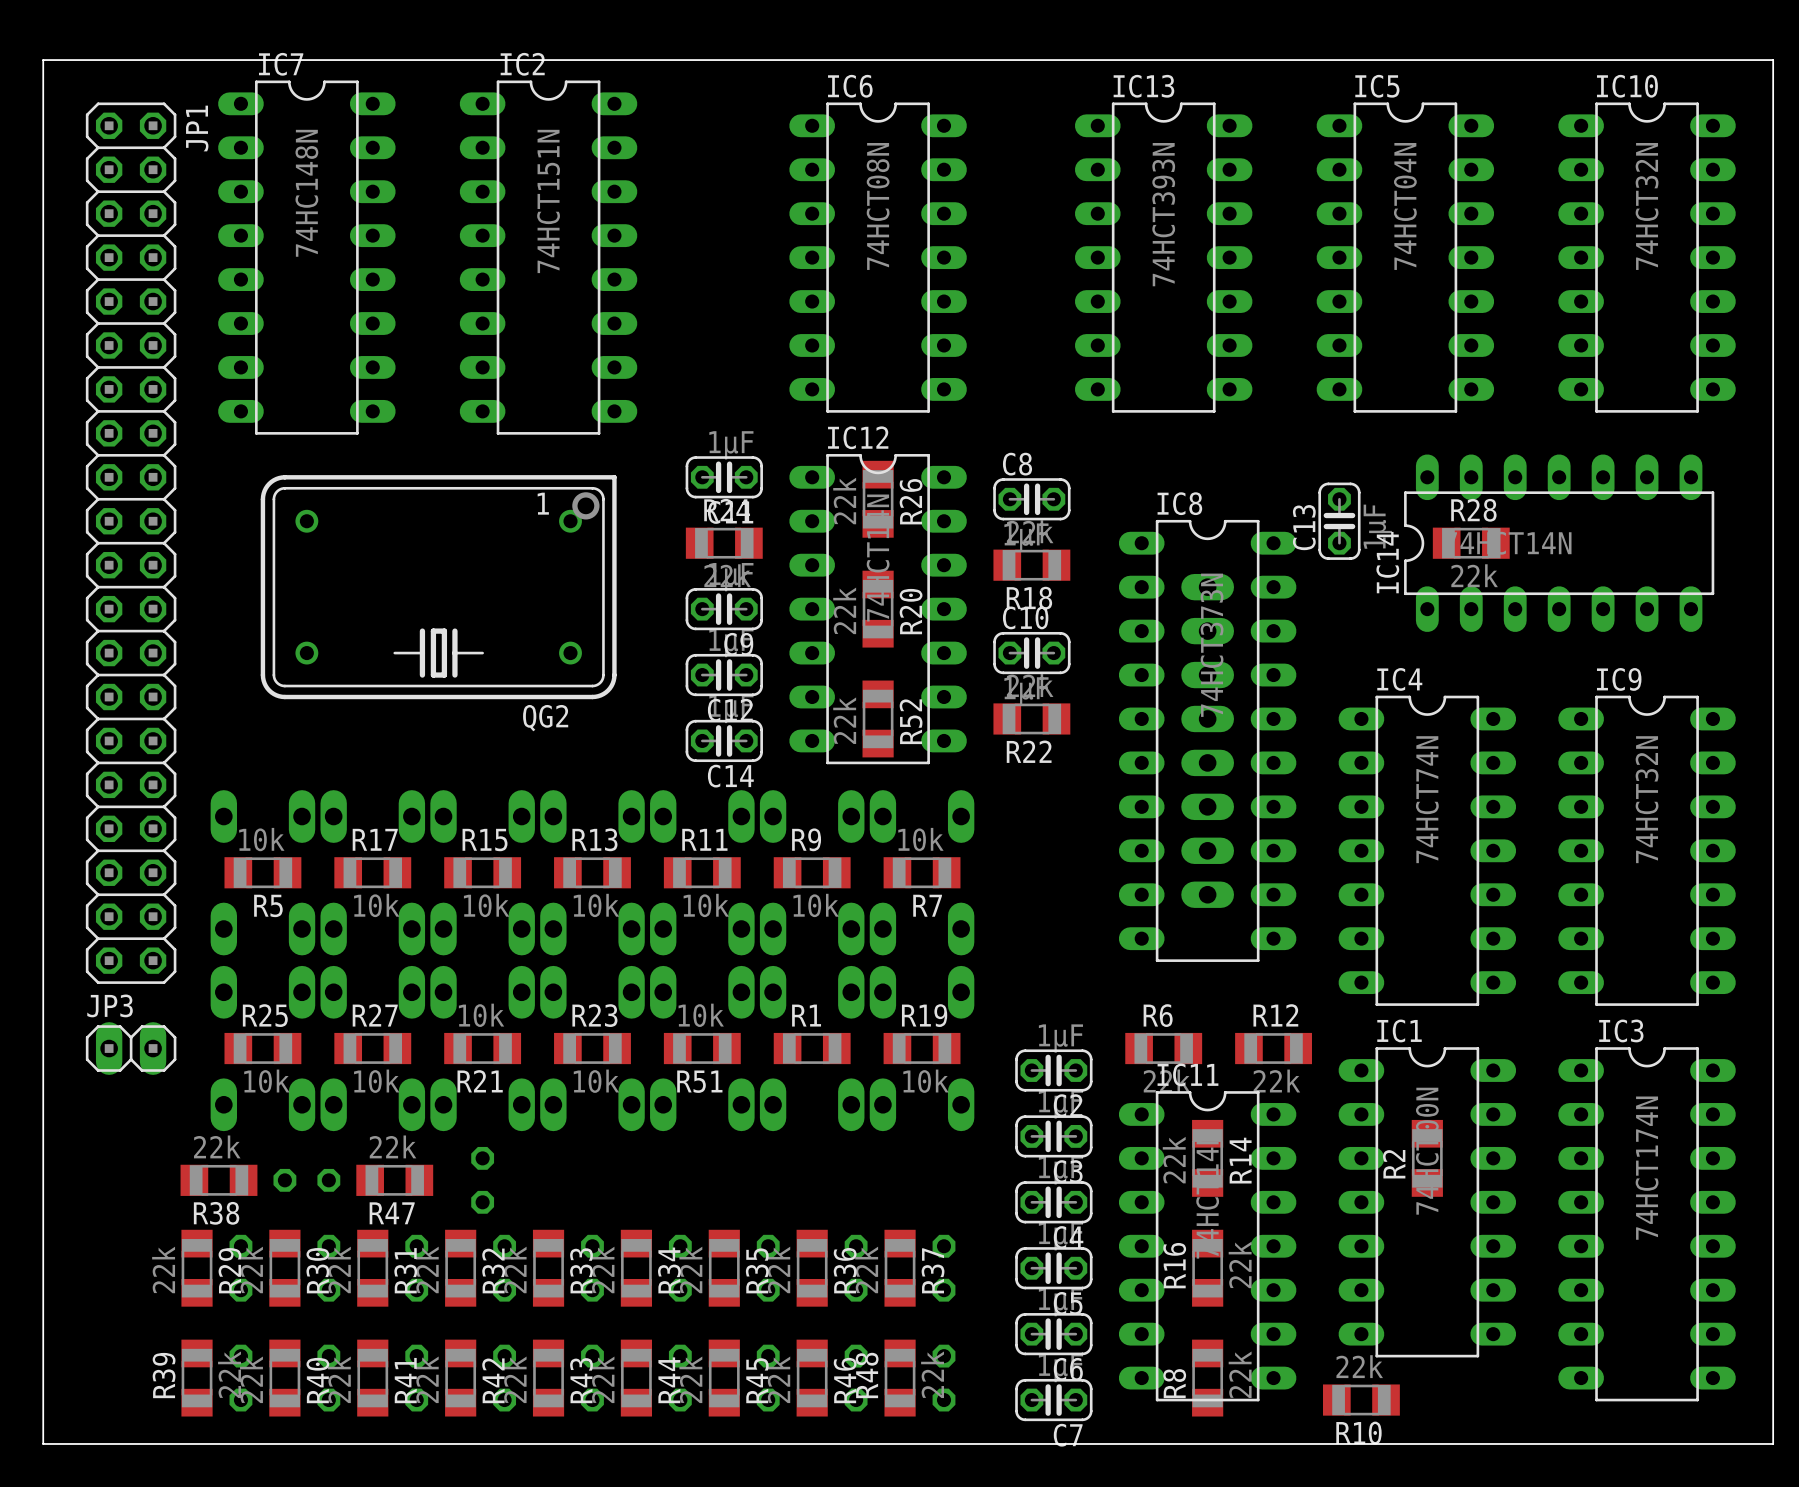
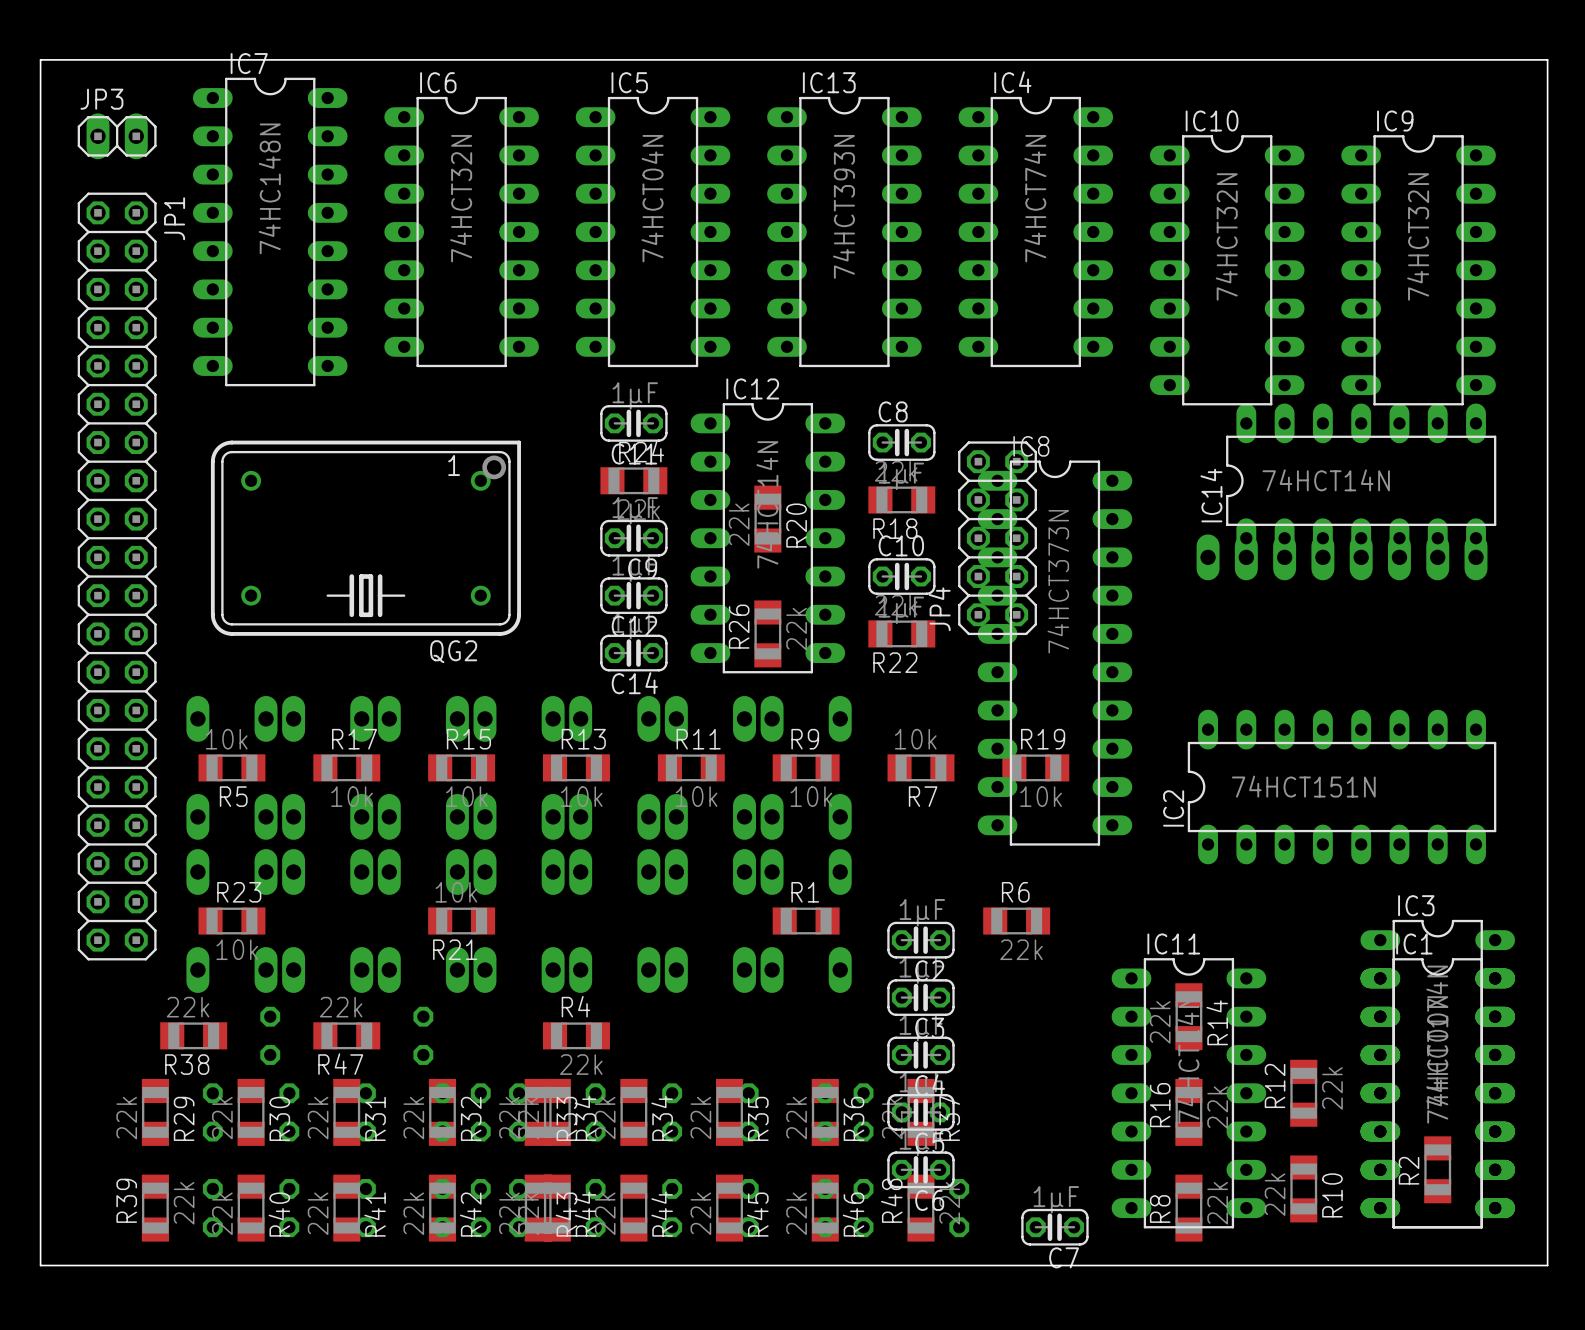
IC6 value: 74HCT08N (878, 206) -> 74HCT32N (461, 198)
IC2 rotation: 0° (548, 257) -> 90° counterclockwise (1342, 787)
IC2 position: (548, 257) -> (1342, 787)
IC6 position: (878, 257) -> (461, 232)
IC13 position: (1163, 257) -> (844, 232)
IC5 position: (1405, 257) -> (653, 232)
IC10 position: (1647, 257) -> (1227, 270)
R26: 22k (878, 499) -> none
C13: 1µF (1339, 521) -> none
JP1 position: (131, 543) -> (117, 576)
R28: 22k (1471, 543) -> none
QG2 position: (438, 587) -> (365, 538)
R20 position: (878, 609) -> (767, 519)
JP4: none -> (997, 538)
R52 value position: 22k (844, 720) -> 22k (796, 629)
R52 name: R52 (911, 721) -> R26 (739, 626)
part rotation: 0° (1207, 740) -> 90° clockwise (1342, 557)
part position: (1207, 740) -> (1342, 557)
R7 value position: 10k (920, 839) -> 10k (811, 796)
IC4 position: (1427, 850) -> (1035, 232)
IC9 position: (1647, 850) -> (1418, 270)
R17 position: (372, 872) -> (346, 767)
R15 position: (482, 872) -> (461, 767)
R13 position: (592, 872) -> (576, 767)
R11 position: (702, 872) -> (691, 767)
R9: 10k (812, 872) -> none
R7: none -> 10k (920, 767)
R19: none -> 10k (1035, 767)
R7 name: R7 (927, 905) -> R9 (805, 739)
R25 name: R25 (265, 1015) -> R23 (239, 892)
R19 name: R19 (924, 1015) -> R1 (805, 892)
R12 name position: R12 (1275, 1015) -> R12 (1275, 1085)
JP3 position: (131, 1048) -> (117, 136)
R27: 10k (372, 1048) -> none
R21 position: (482, 1048) -> (461, 921)
R23: 10k (592, 1048) -> none
R51: 10k (702, 1048) -> none
R1: (812, 1048) -> none
R12 rotation: 0° (1273, 1048) -> 90° clockwise (1303, 1093)
R12 position: (1273, 1048) -> (1303, 1093)
R19 value: 10k (925, 1081) -> none
R12 value position: 22k (1276, 1081) -> 22k (1332, 1088)
R14 position: (1207, 1158) -> (1188, 1016)
R2 position: (1427, 1158) -> (1437, 1169)
part rotation: 0° (306, 1180) -> 90° clockwise (270, 1035)
R4: none -> 22k (576, 1035)
IC1 position: (1427, 1202) -> (1437, 1093)
IC11 position: (1207, 1246) -> (1188, 1093)
R29 position: (197, 1268) -> (155, 1112)
R31 position: (372, 1268) -> (346, 1112)
R32 position: (460, 1268) -> (442, 1112)
R33 position: (548, 1268) -> (538, 1112)
part: none -> (480, 1112)
R36 position: (812, 1268) -> (825, 1112)
R35: none -> 22k (729, 1112)
R37 position: (900, 1268) -> (920, 1112)
part: none -> (863, 1112)
R16 position: (1207, 1268) -> (1188, 1112)
R35 name: R35 (757, 1270) -> R34 (662, 1118)
R10 value position: 22k (1359, 1366) -> 22k (1275, 1194)
R39 position: (197, 1378) -> (155, 1208)
R41 position: (372, 1378) -> (346, 1208)
R42 position: (460, 1378) -> (442, 1208)
R43 position: (548, 1378) -> (538, 1208)
part: none -> (480, 1208)
R46 position: (812, 1378) -> (825, 1208)
R45: none -> 22k (729, 1208)
R48 position: (900, 1378) -> (920, 1208)
part: none -> (863, 1208)
part: none -> (959, 1208)
R8 position: (1207, 1378) -> (1188, 1208)
R45 name: R45 (757, 1380) -> R44 (662, 1214)
C7 position: (1053, 1400) -> (1054, 1227)
R10 rotation: 0° (1361, 1400) -> 90° clockwise (1303, 1188)
R10 position: (1361, 1400) -> (1303, 1188)
R10 name position: R10 (1358, 1433) -> R10 (1332, 1195)

